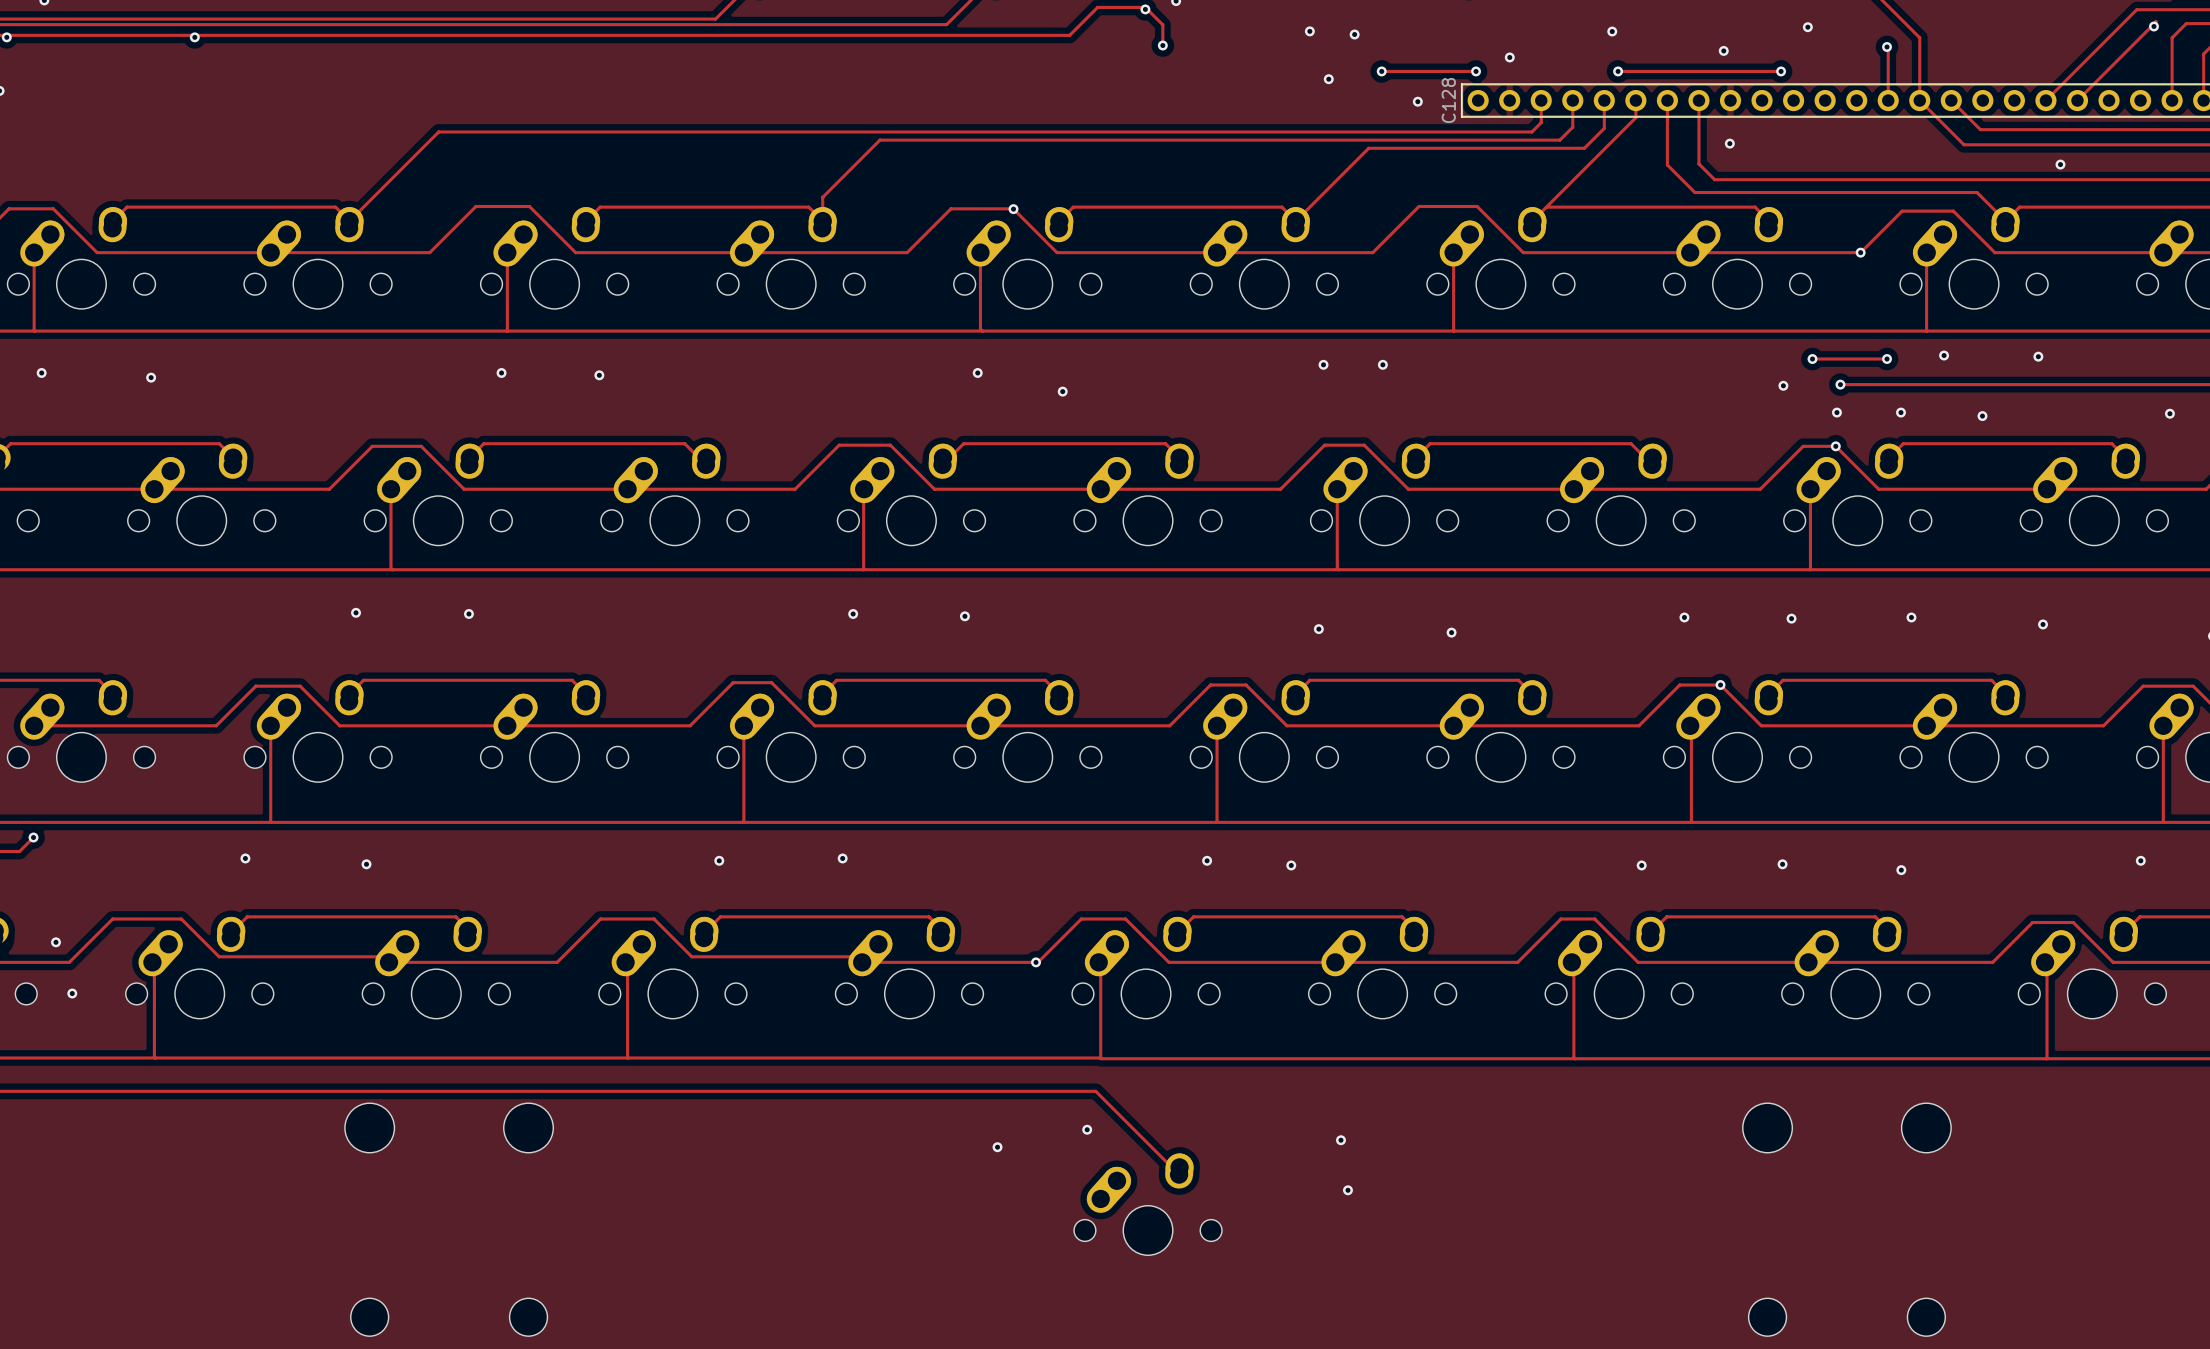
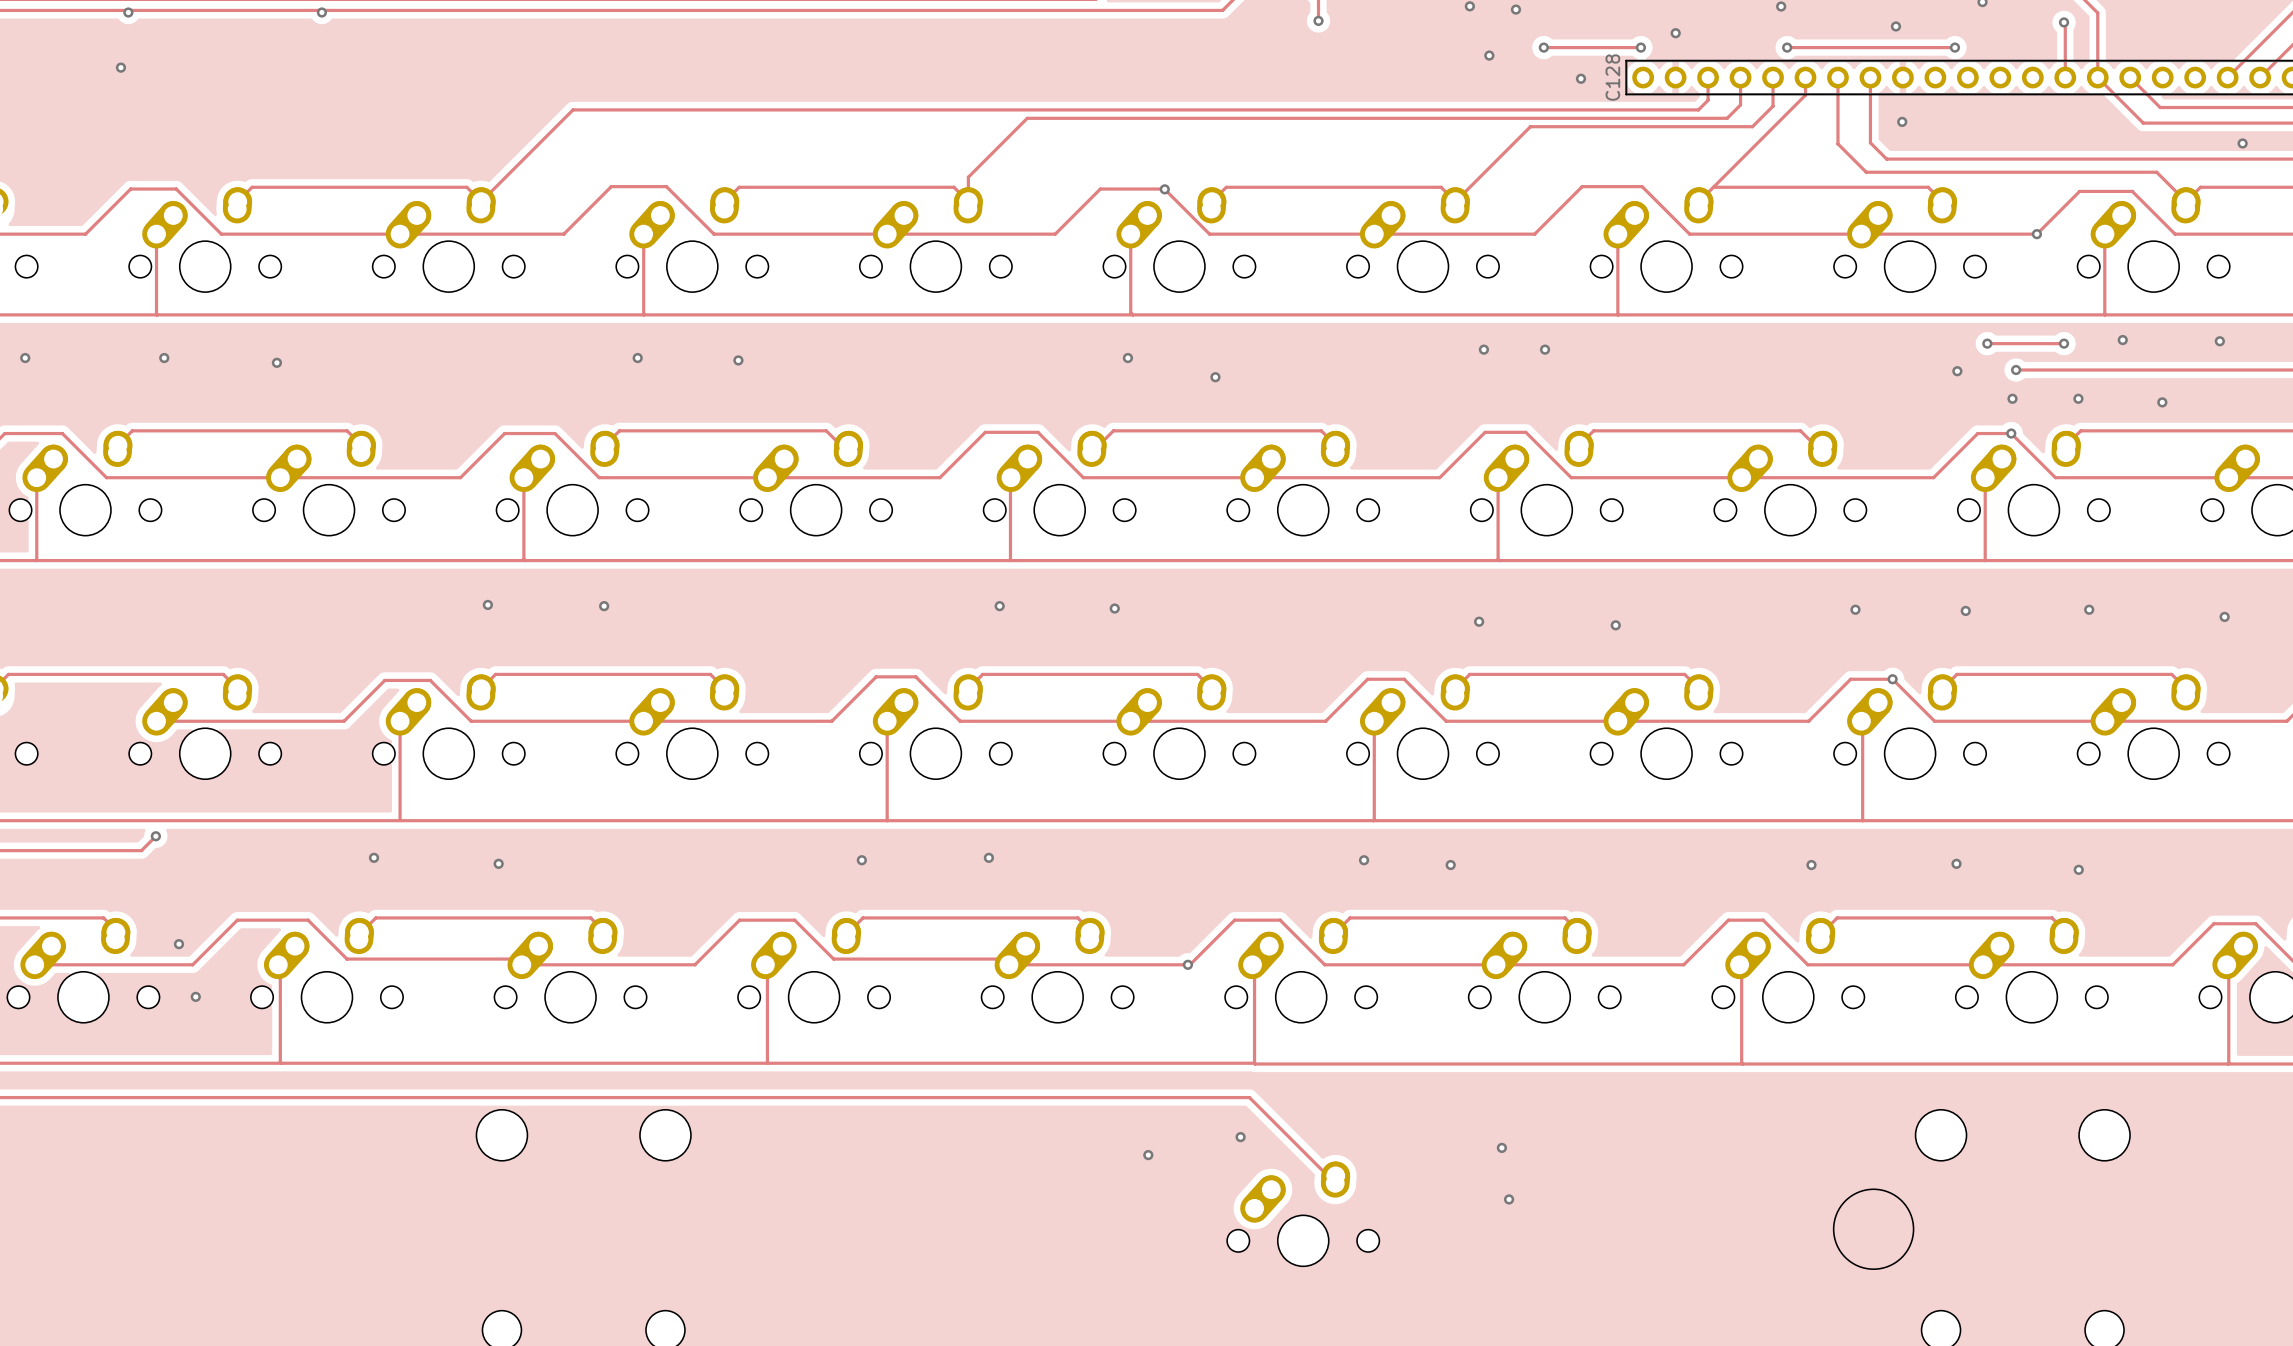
round board edge: none -> [1833, 1188, 1915, 1270]

